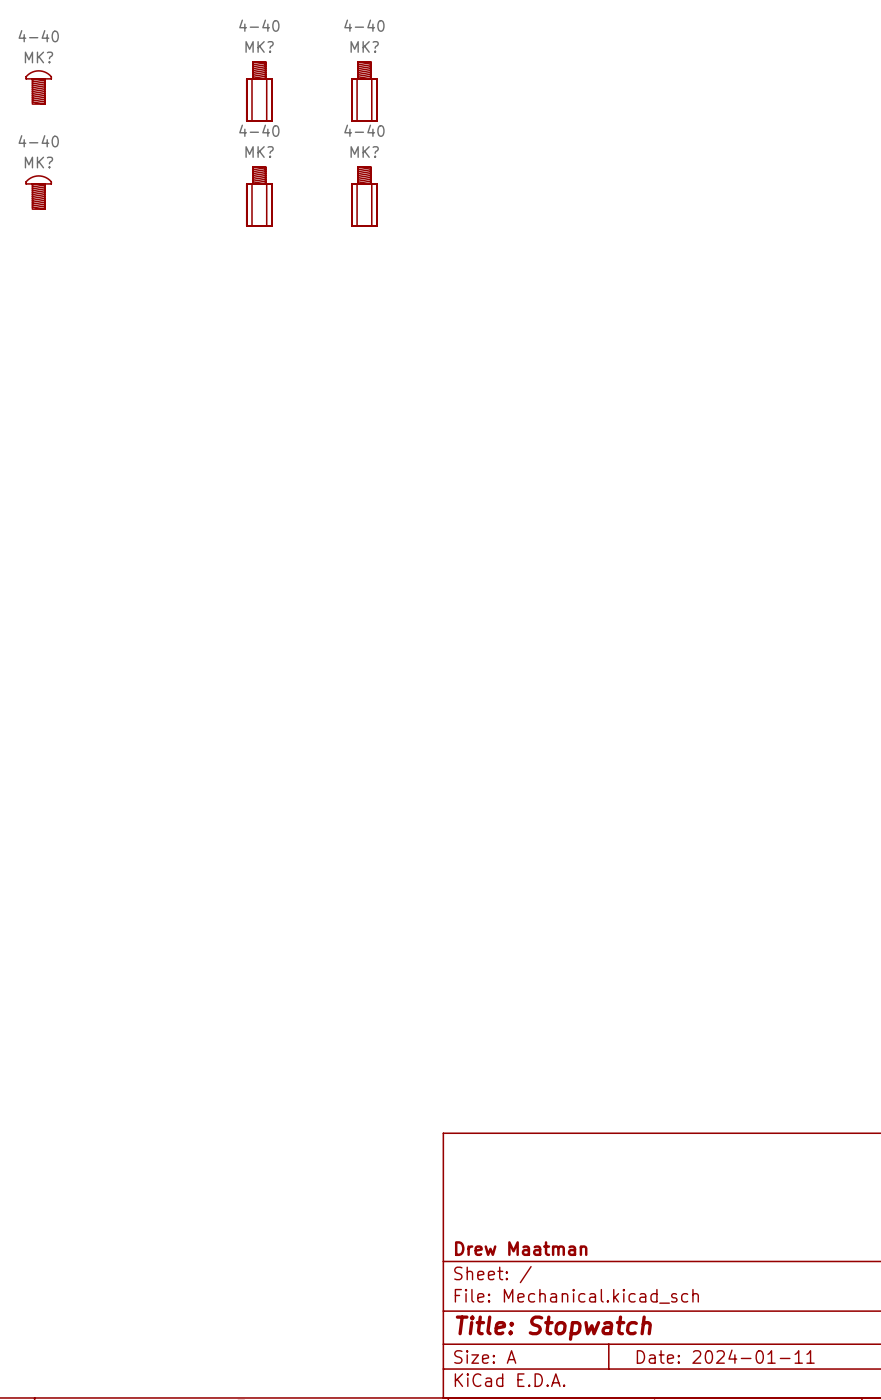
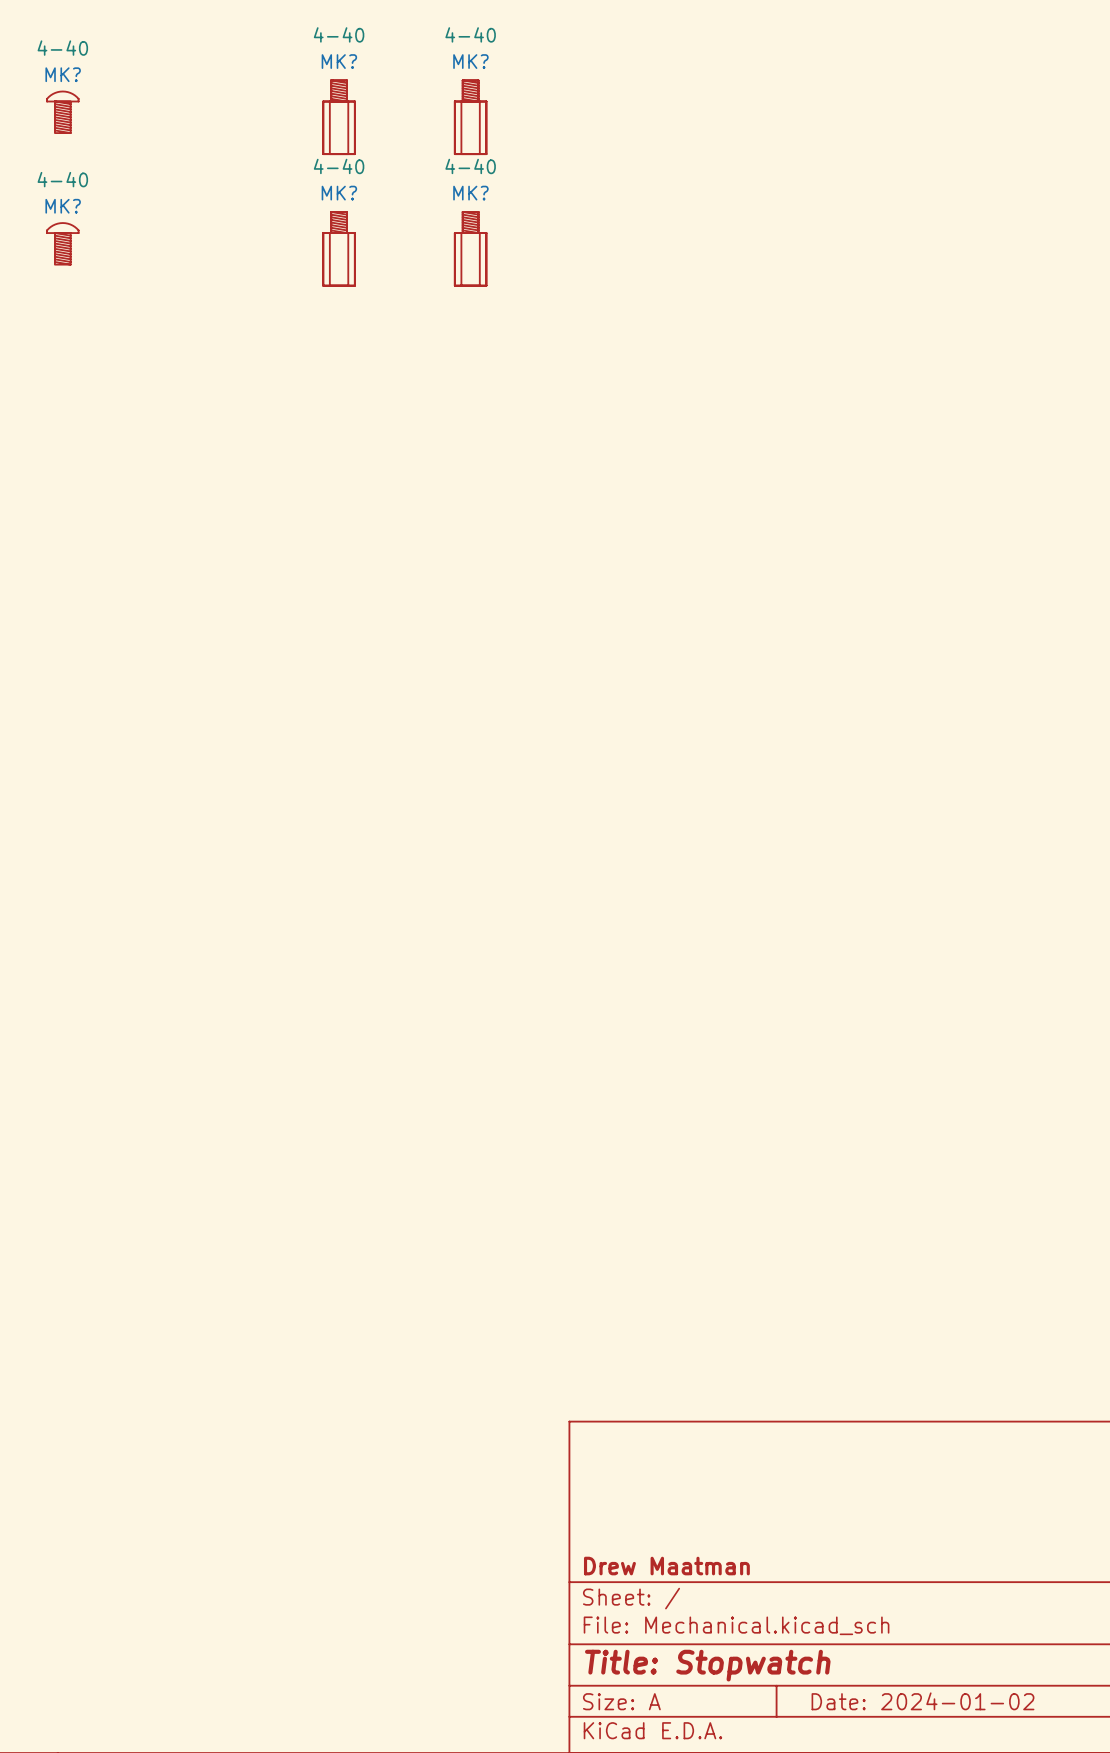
title block: Date: 2024-01-11 (725, 1356) -> Date: 2024-01-02 (922, 1701)

